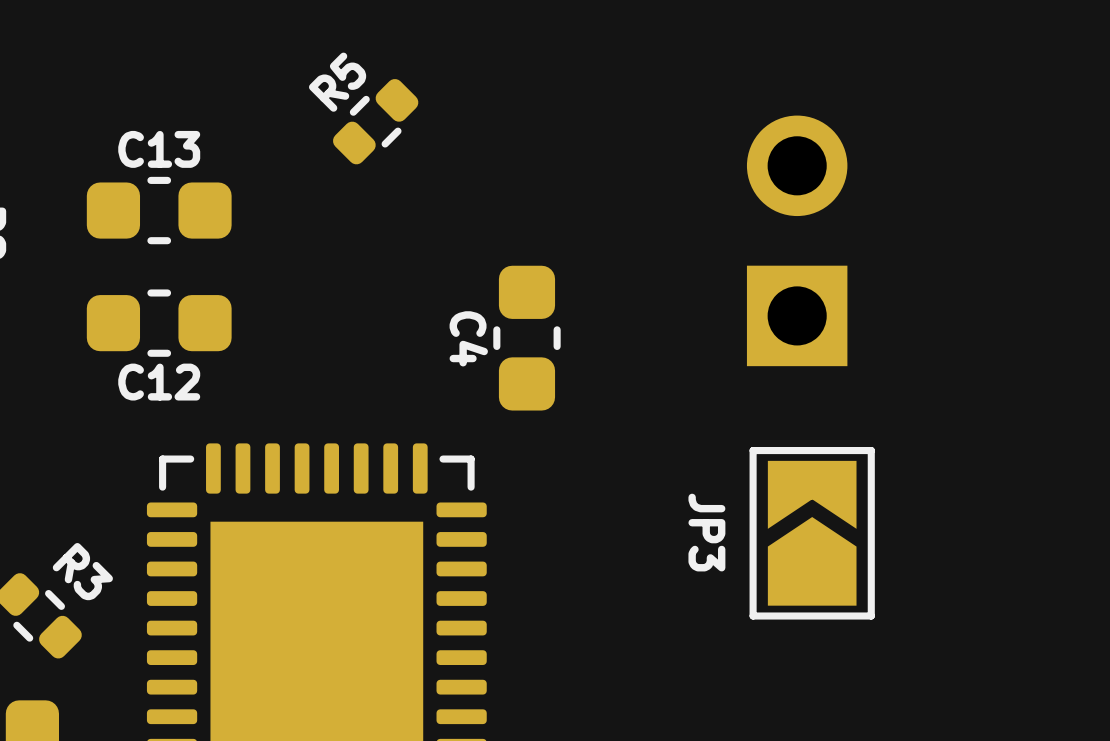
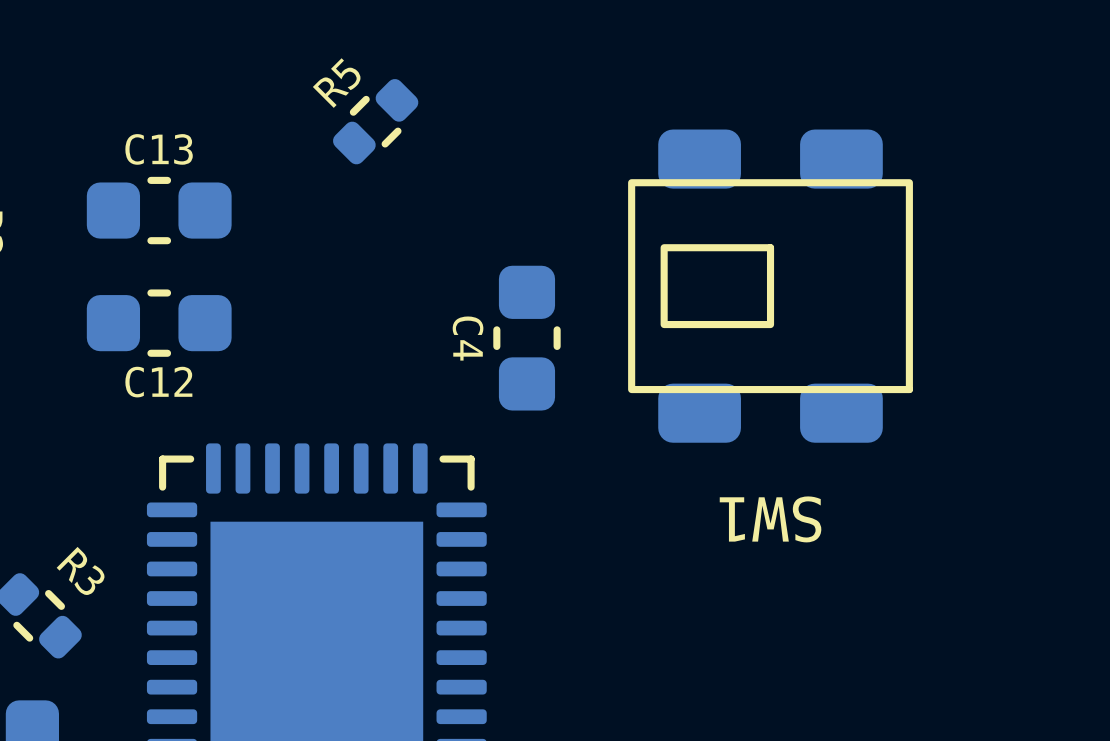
part: (797, 240) -> none
SW1: none -> (770, 286)
JP3: (812, 533) -> none

